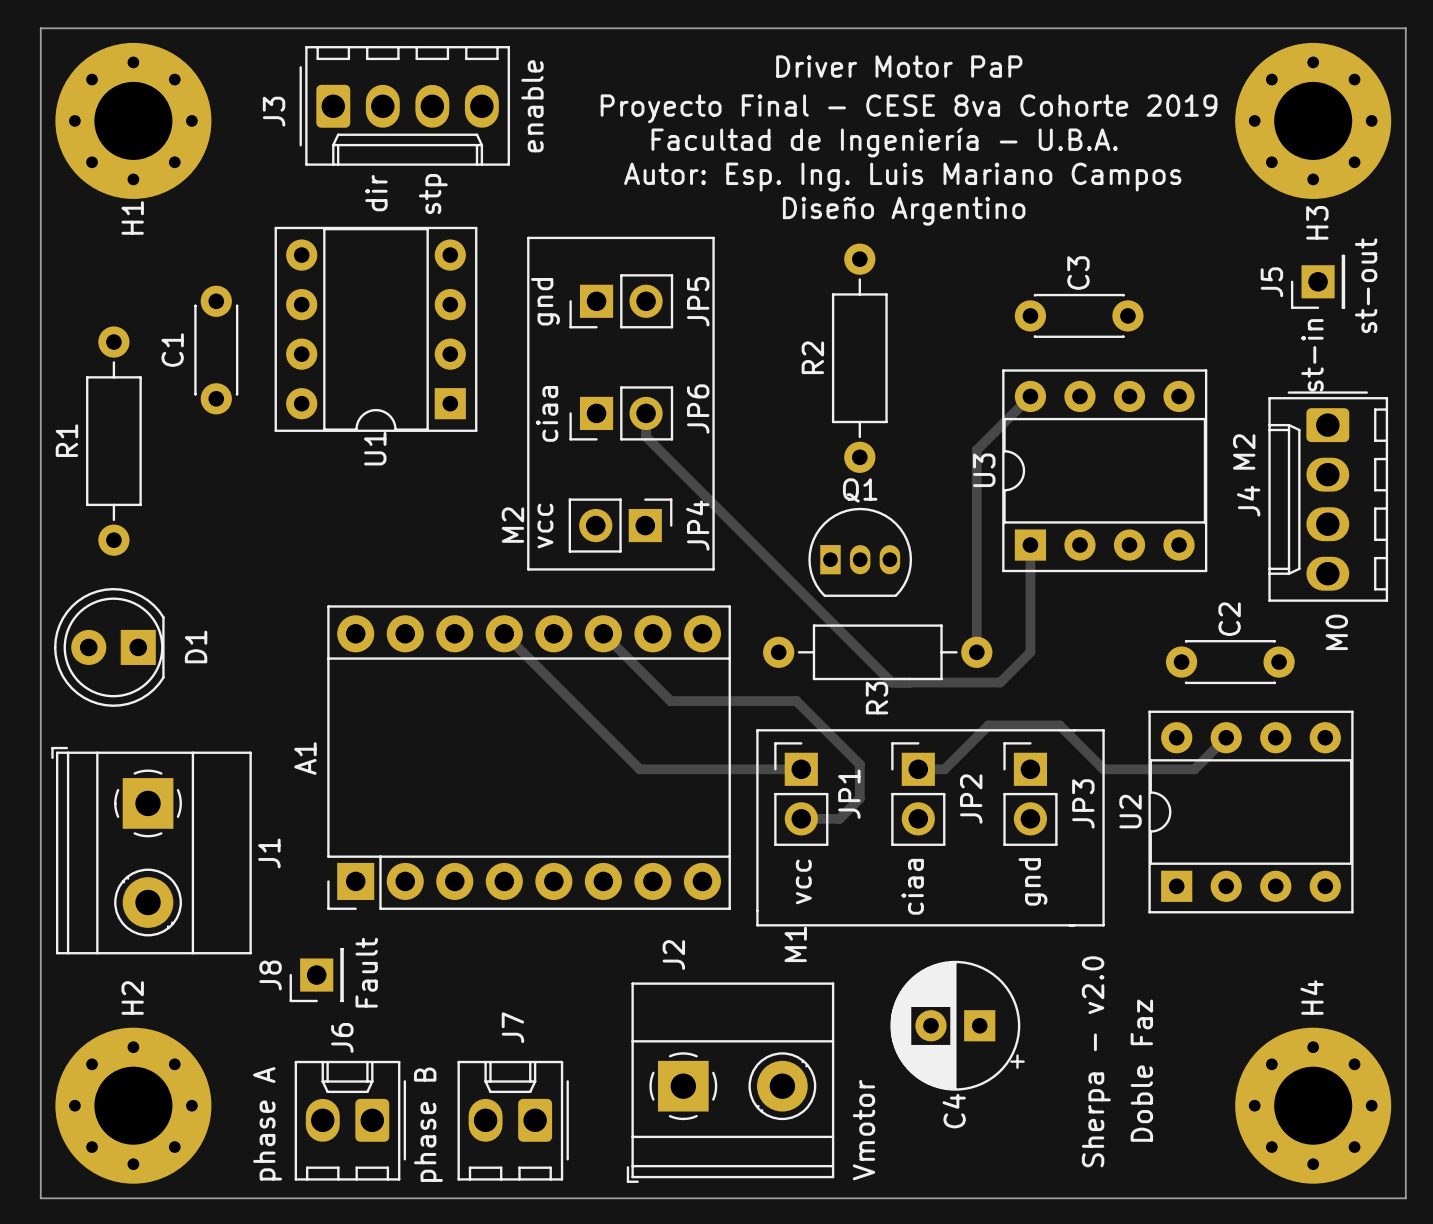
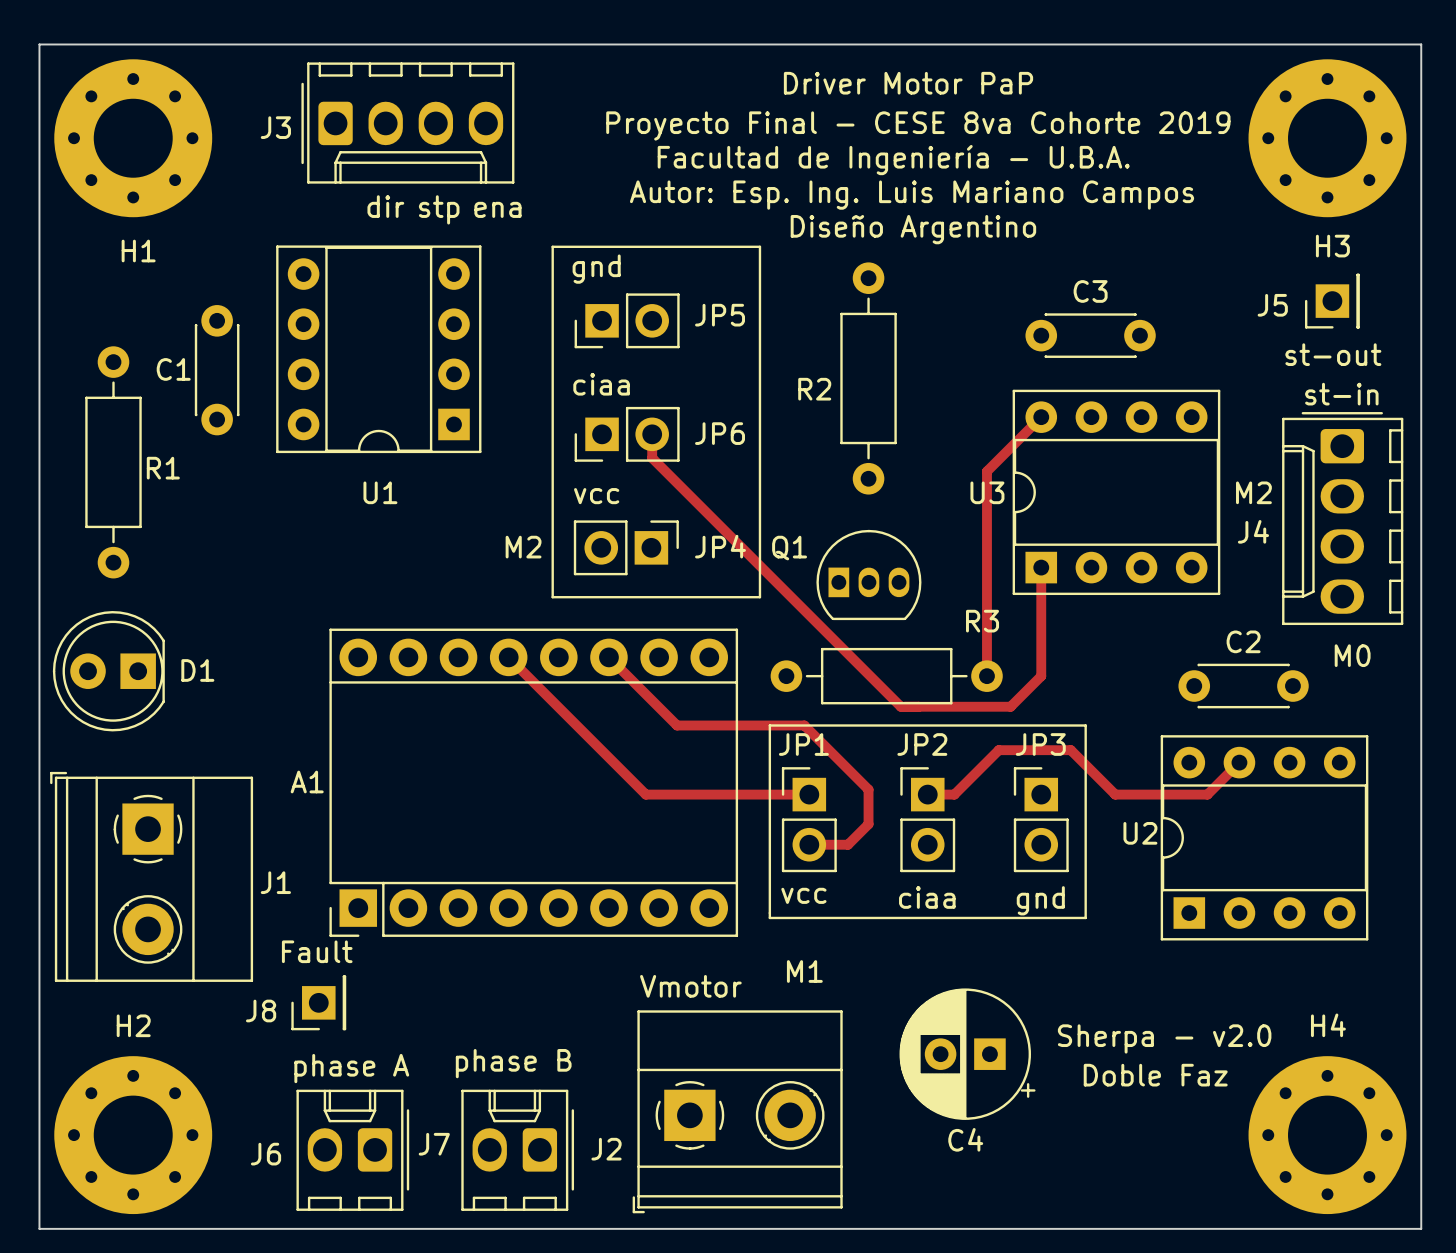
text: enable (532, 106) -> none
J3 name rotation: 0° (274, 111) -> 90° clockwise (275, 127)
text: none -> ena (497, 209)
text rotation: 0° (376, 193) -> 90° clockwise (385, 206)
text rotation: 0° (433, 194) -> 90° clockwise (439, 209)
H1 name rotation: 0° (132, 217) -> 90° clockwise (138, 251)
H3 name rotation: 0° (1317, 222) -> 90° clockwise (1332, 246)
line: (528, 237) (528, 569) (713, 569) (713, 237) (528, 237) -> (552, 246) (552, 597) (759, 597) (759, 246) (552, 246)
C3 name rotation: 0° (1078, 273) -> 90° clockwise (1090, 291)
J5 name rotation: 0° (1271, 282) -> 90° clockwise (1272, 305)
text rotation: 0° (1366, 285) -> 90° clockwise (1333, 354)
text rotation: 0° (545, 301) -> 90° clockwise (596, 269)
text position: gnd (545, 301) -> gnd (596, 269)
JP5 name rotation: 0° (698, 301) -> 90° clockwise (720, 315)
C1 name rotation: 0° (172, 350) -> 90° clockwise (173, 369)
text rotation: 0° (1312, 355) -> 90° clockwise (1341, 394)
R2 name rotation: 0° (812, 357) -> 90° clockwise (814, 389)
JP6 name rotation: 0° (698, 409) -> 90° clockwise (720, 433)
text rotation: 0° (547, 413) -> 90° clockwise (601, 384)
R1 name rotation: 0° (66, 440) -> 90° clockwise (163, 468)
R1 name position: R1 (66, 440) -> R1 (163, 468)
U1 name rotation: 0° (375, 448) -> 90° clockwise (380, 492)
text rotation: 0° (1244, 451) -> 90° clockwise (1253, 492)
U3 name rotation: 0° (984, 470) -> 90° clockwise (987, 492)
Q1 name position: Q1 (860, 490) -> Q1 (789, 548)
J4 name rotation: 0° (1248, 501) -> 90° clockwise (1253, 531)
text rotation: 0° (512, 525) -> 90° clockwise (523, 547)
JP4 name rotation: 0° (697, 525) -> 90° clockwise (720, 546)
text rotation: 0° (545, 526) -> 90° clockwise (596, 496)
text position: vcc (545, 526) -> vcc (596, 496)
C2 name rotation: 0° (1229, 619) -> 90° clockwise (1243, 641)
text rotation: 0° (1336, 632) -> 90° clockwise (1352, 655)
D1 name rotation: 0° (196, 646) -> 90° clockwise (197, 670)
R3 name rotation: 0° (877, 698) -> 90° clockwise (982, 621)
R3 name position: R3 (877, 698) -> R3 (982, 621)
line: (757, 730) (1103, 730) (1103, 925) (757, 925) (757, 730) -> (769, 725) (769, 917) (1085, 917) (1085, 725) (769, 725)
A1 name rotation: 0° (305, 758) -> 90° clockwise (307, 782)
JP1 name rotation: 0° (849, 794) -> 90° clockwise (803, 744)
JP1 name position: JP1 (849, 794) -> JP1 (803, 744)
JP2 name rotation: 0° (971, 799) -> 90° clockwise (922, 744)
JP2 name position: JP2 (971, 799) -> JP2 (922, 744)
JP3 name rotation: 0° (1083, 803) -> 90° clockwise (1040, 744)
JP3 name position: JP3 (1083, 803) -> JP3 (1040, 744)
U2 name rotation: 0° (1130, 811) -> 90° clockwise (1140, 833)
J1 name rotation: 0° (269, 853) -> 90° clockwise (275, 882)
text rotation: 0° (803, 881) -> 90° clockwise (803, 895)
text rotation: 0° (1032, 881) -> 90° clockwise (1040, 900)
text rotation: 0° (912, 886) -> 90° clockwise (927, 897)
text rotation: 0° (795, 944) -> 90° clockwise (804, 971)
J2 name rotation: 0° (673, 955) -> 90° clockwise (606, 1149)
J2 name position: J2 (673, 955) -> J2 (606, 1149)
text rotation: 0° (366, 972) -> 90° clockwise (317, 951)
J8 name rotation: 0° (270, 975) -> 90° clockwise (261, 1010)
H2 name rotation: 0° (132, 997) -> 90° clockwise (133, 1025)
H4 name rotation: 0° (1312, 997) -> 90° clockwise (1328, 1025)
J7 name rotation: 0° (512, 1027) -> 90° clockwise (434, 1144)
J7 name position: J7 (512, 1027) -> J7 (434, 1144)
J6 name rotation: 0° (342, 1037) -> 90° clockwise (266, 1154)
J6 name position: J6 (342, 1037) -> J6 (266, 1154)
text rotation: 0° (1096, 1061) -> 90° clockwise (1164, 1038)
text rotation: 0° (1141, 1070) -> 90° clockwise (1155, 1075)
C4 name rotation: 0° (954, 1111) -> 90° clockwise (965, 1139)
text rotation: 0° (267, 1123) -> 90° clockwise (351, 1068)
text rotation: 0° (428, 1124) -> 90° clockwise (513, 1063)
text rotation: 0° (863, 1130) -> 90° clockwise (690, 986)
text position: Vmotor (863, 1130) -> Vmotor (690, 986)

